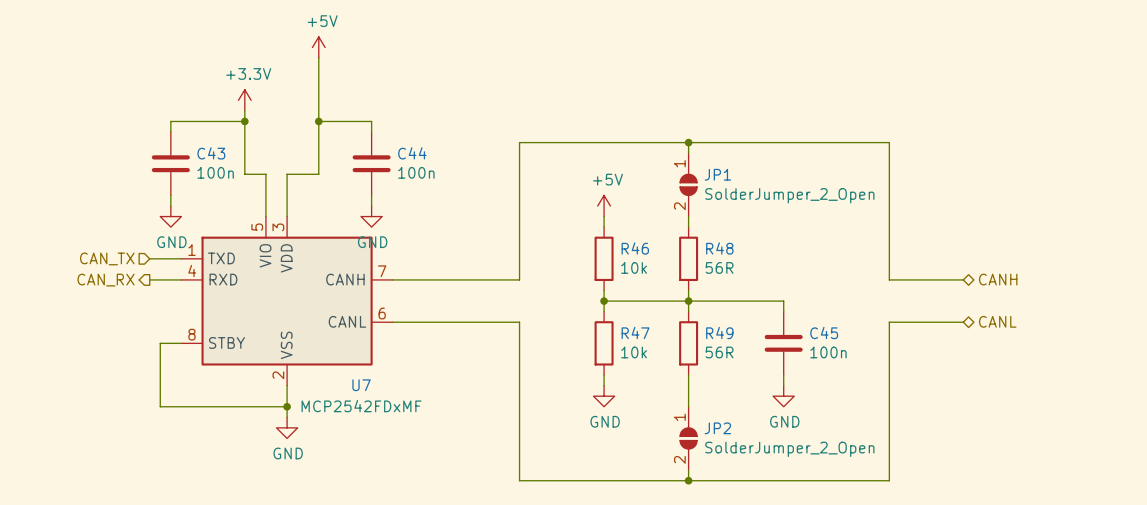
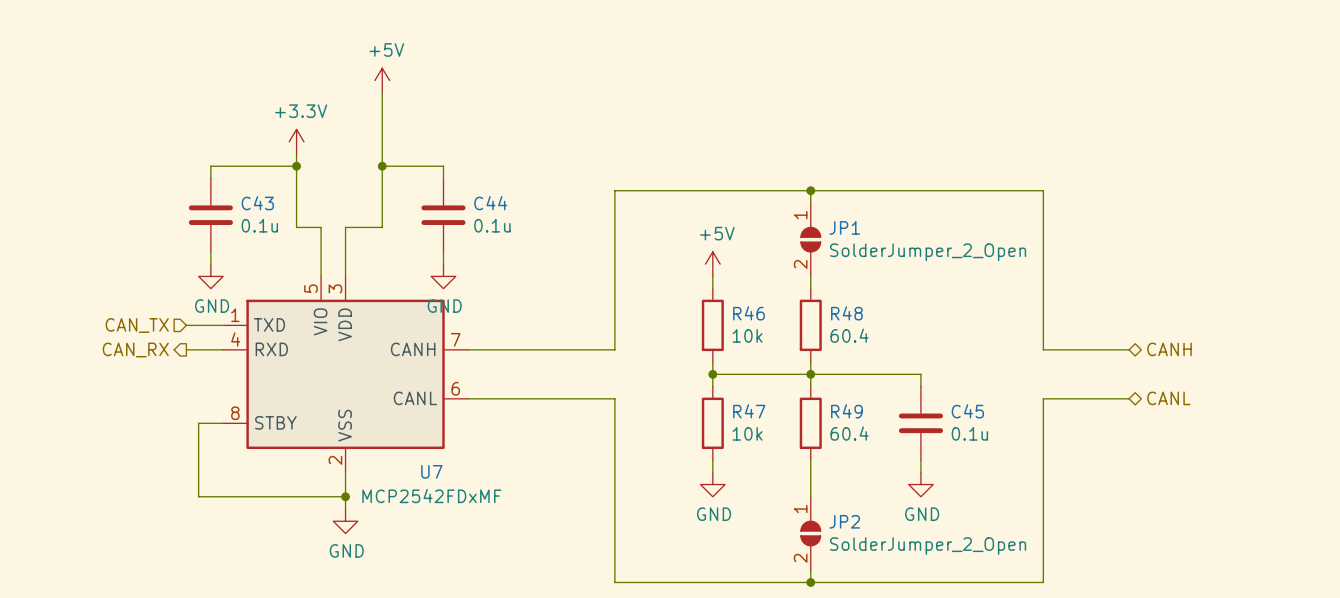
C43 value: 100n (215, 172) -> 0.1u (259, 225)
C44 value: 100n (416, 172) -> 0.1u (492, 225)
R48 value: 56R (719, 267) -> 60.4 (849, 335)
R49 value: 56R (719, 352) -> 60.4 (849, 433)
C45 value: 100n (828, 352) -> 0.1u (969, 433)

